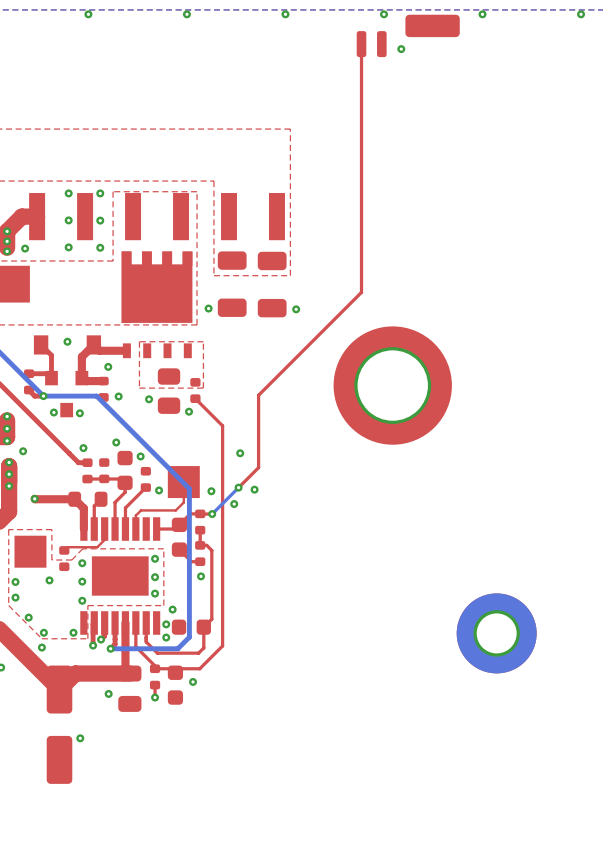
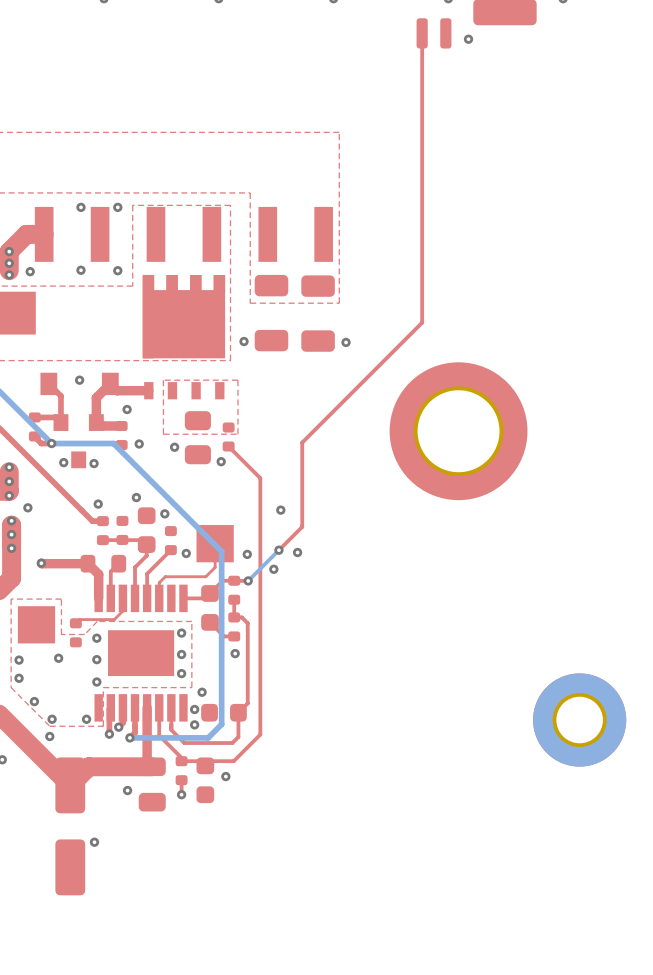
via: (68, 220) -> none
via: (100, 220) -> none

